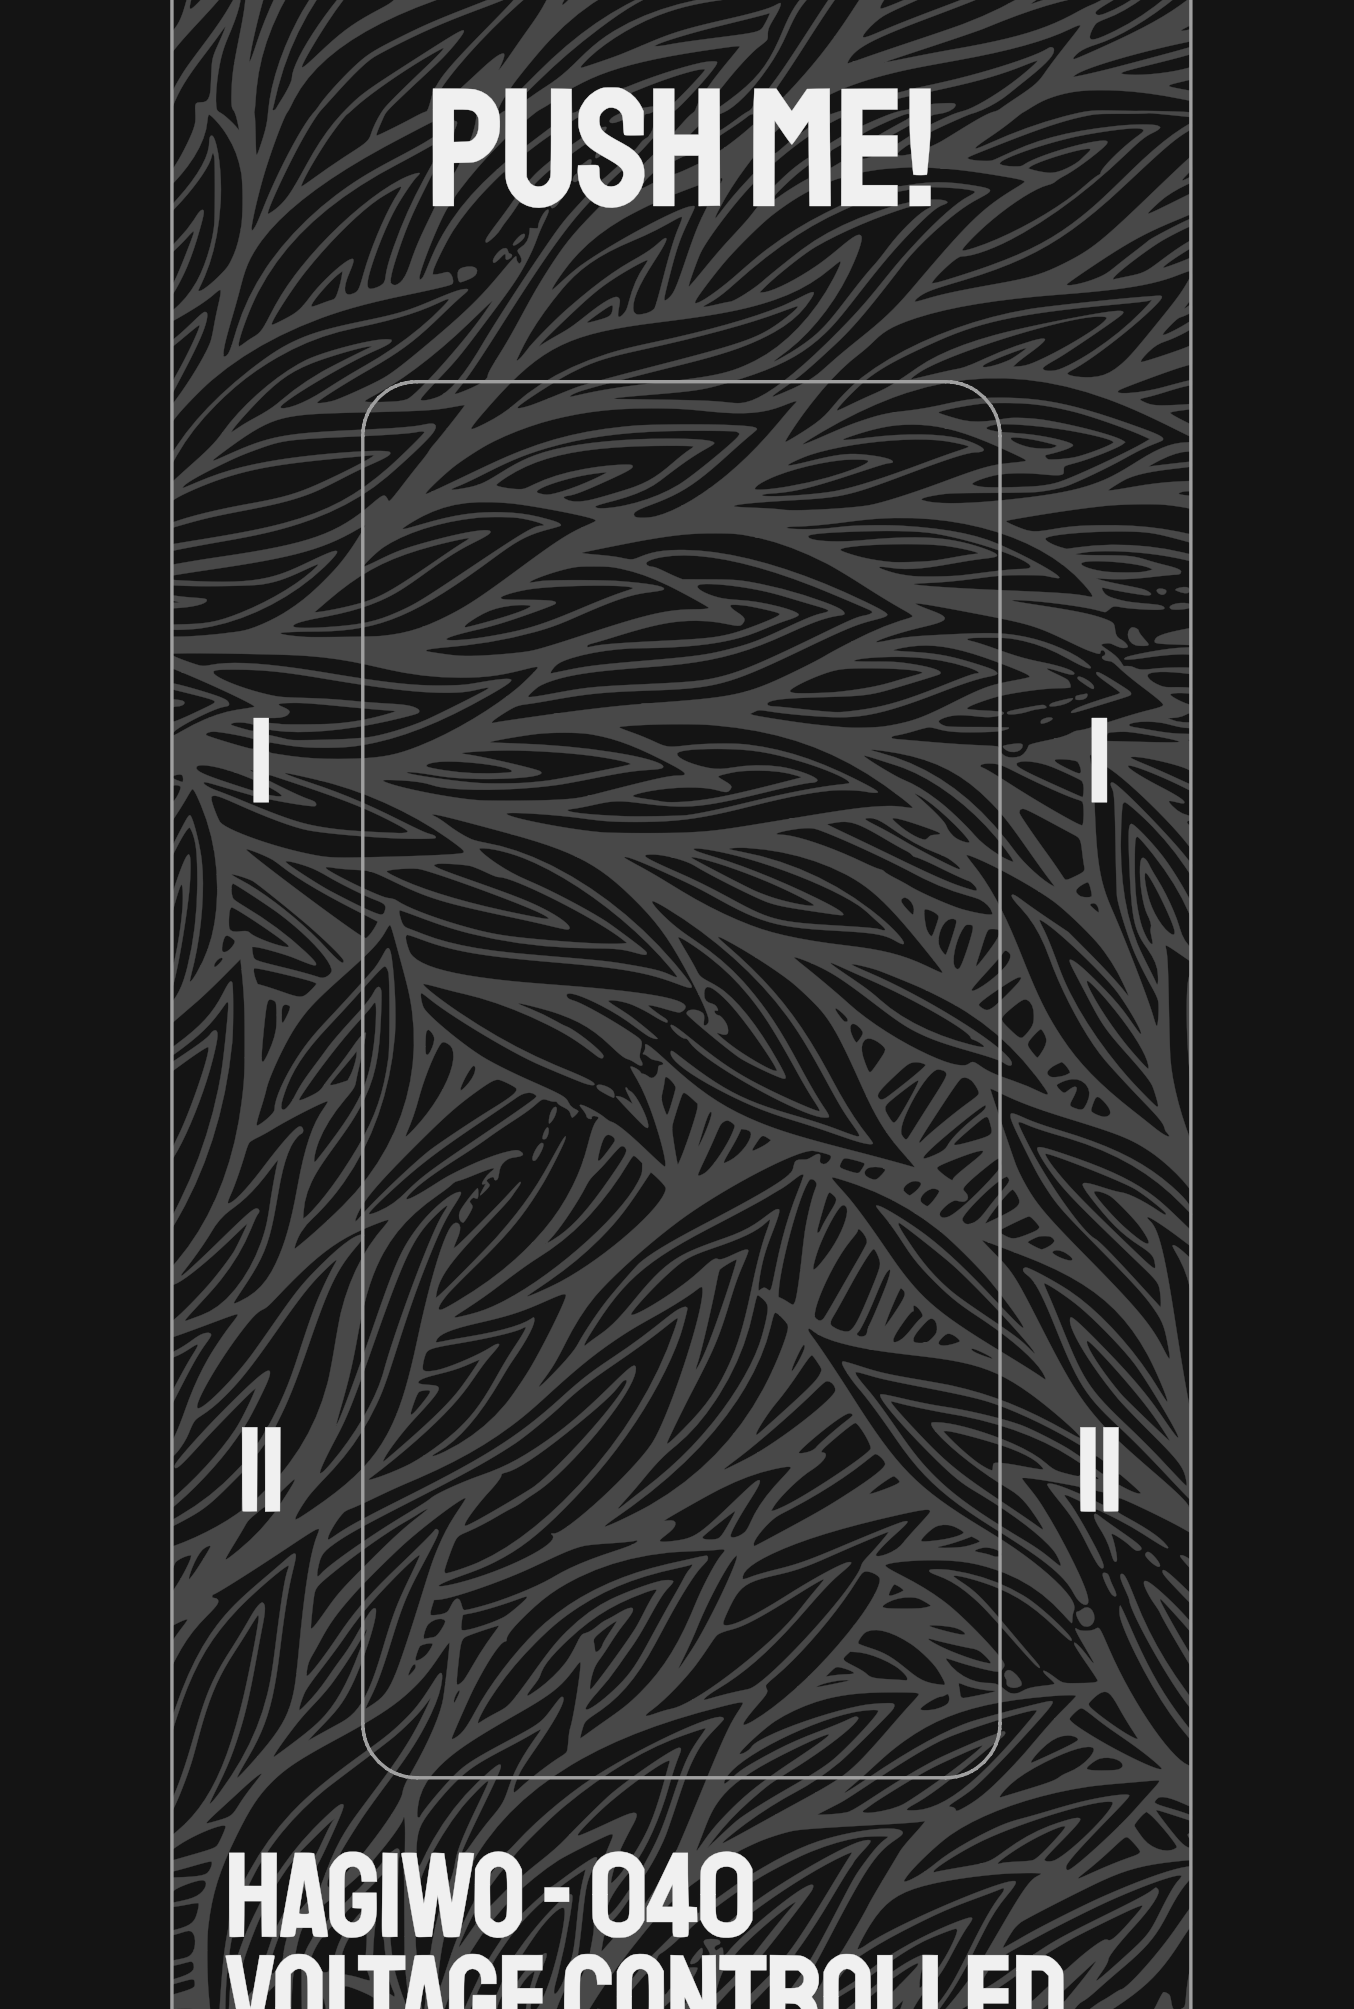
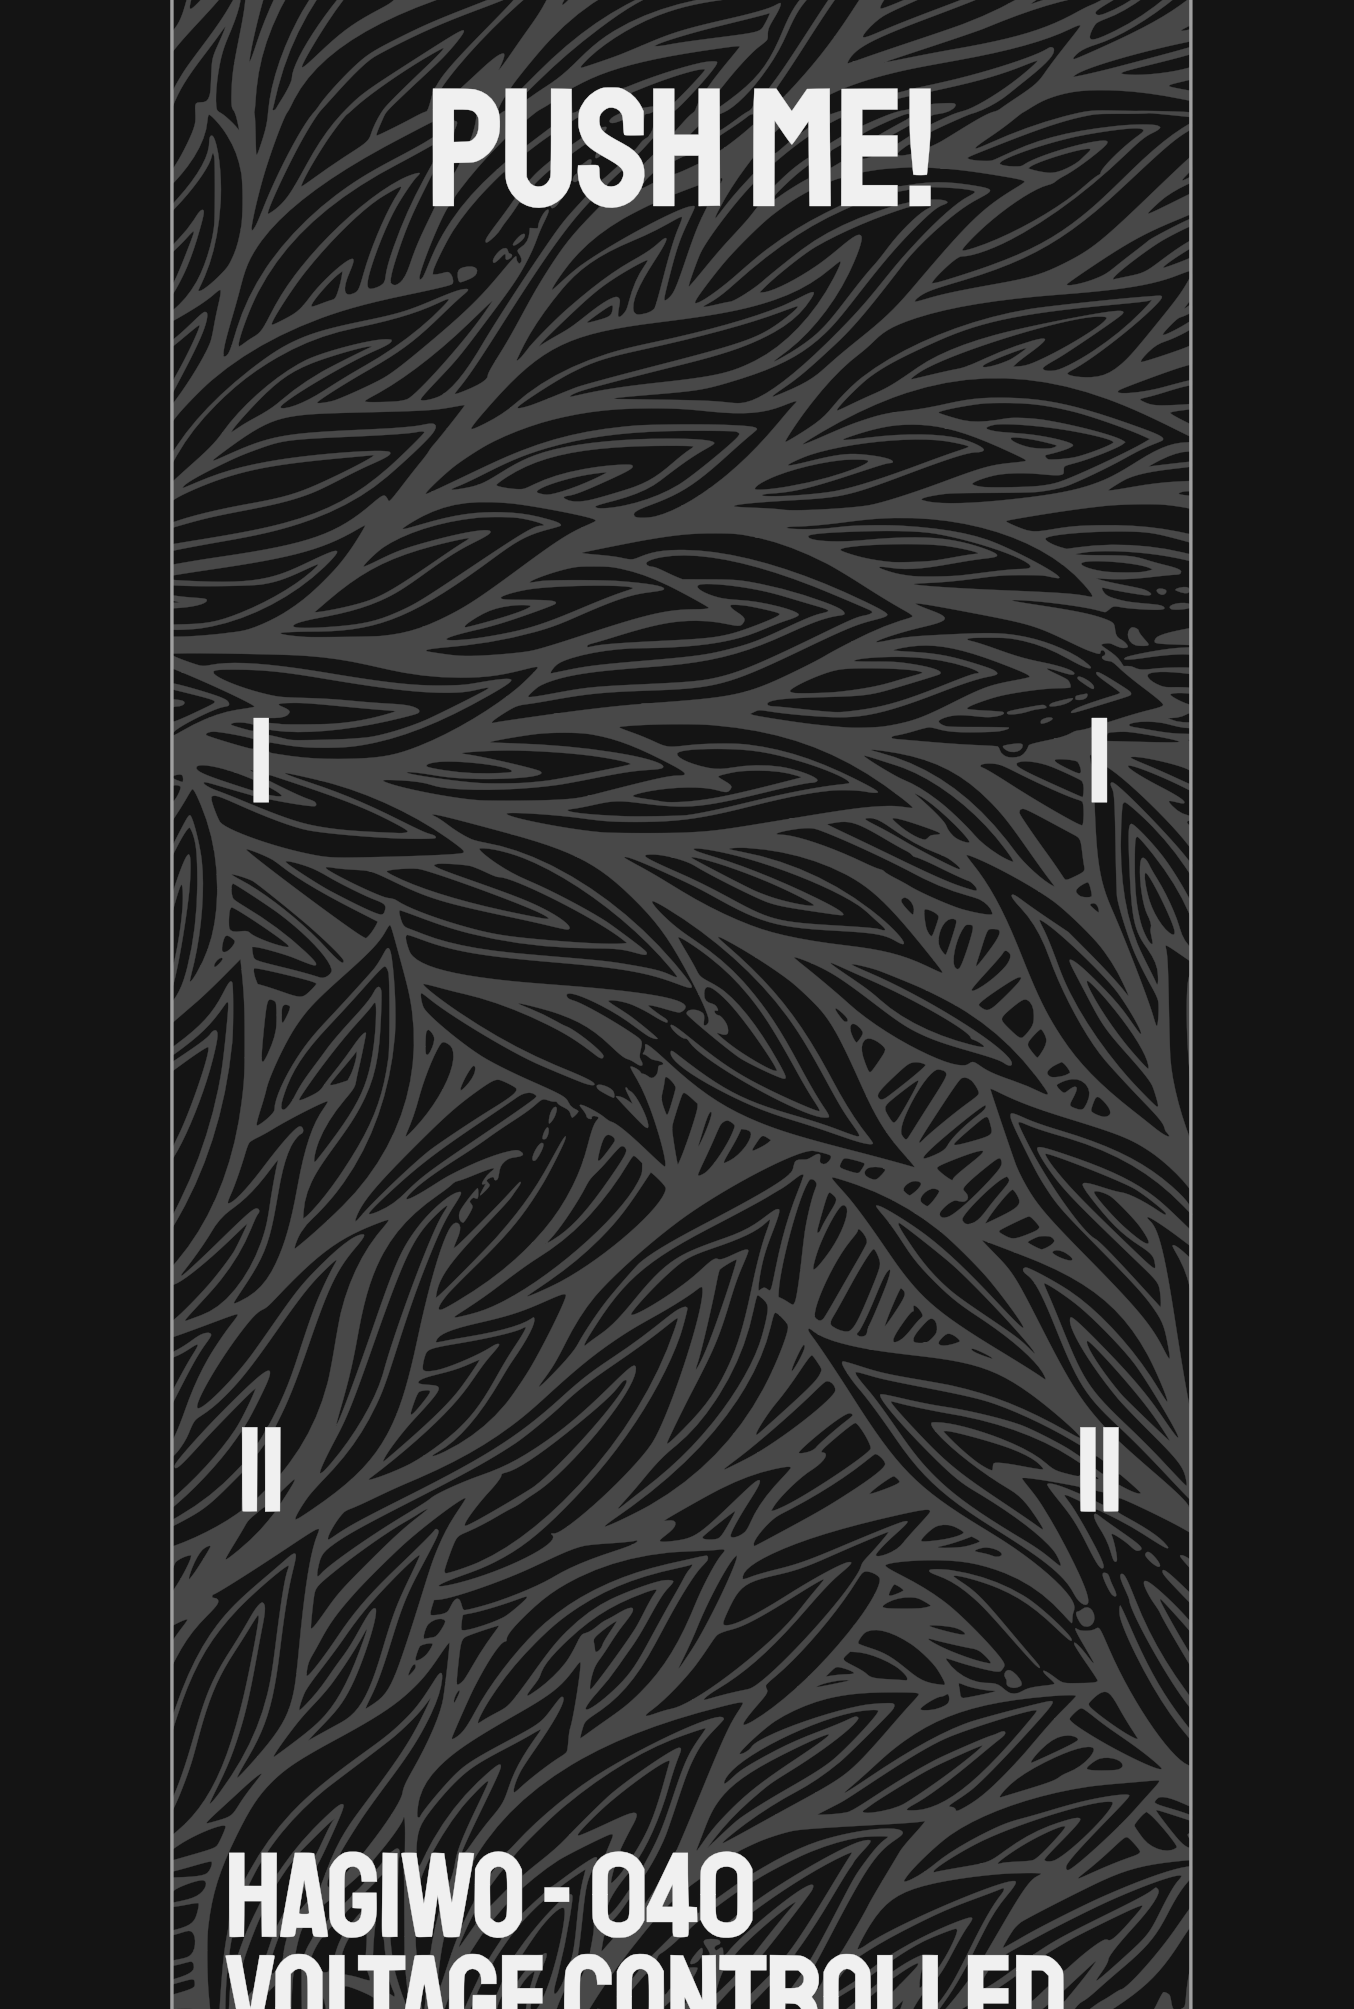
board edge: (417, 381) (951, 381) (961, 384) (976, 390) (990, 405) (995, 414) (1000, 436) (1000, 1723) (997, 1739) (990, 1753) (976, 1768) (966, 1773) (945, 1777) (417, 1777) (400, 1775) (386, 1768) (372, 1753) (367, 1744) (362, 1723) (362, 436) (367, 414) (378, 397) (395, 385) (417, 381) -> none

